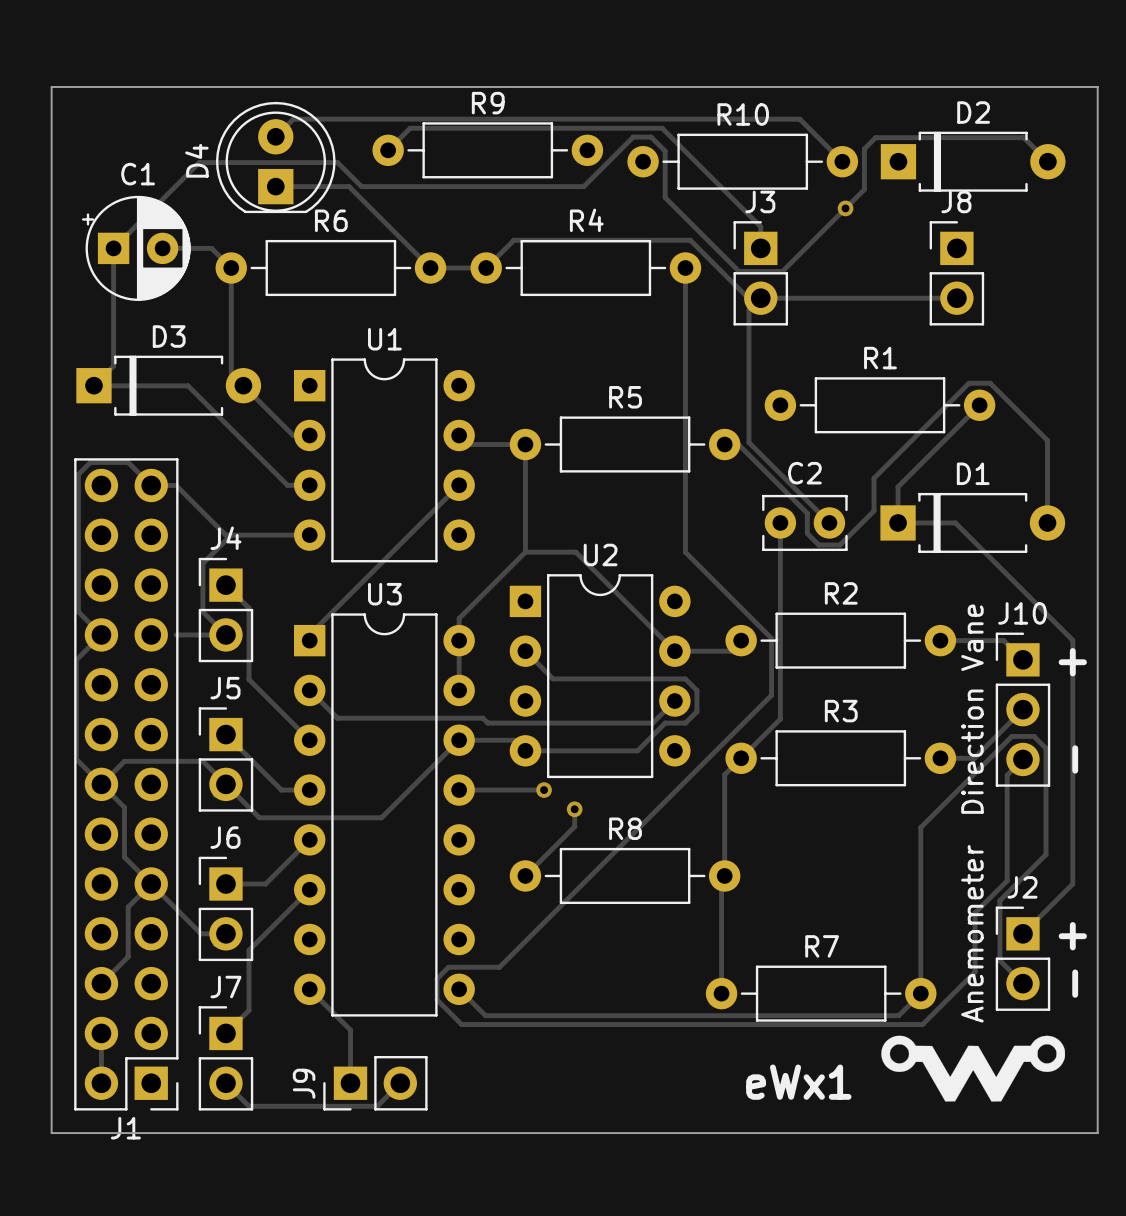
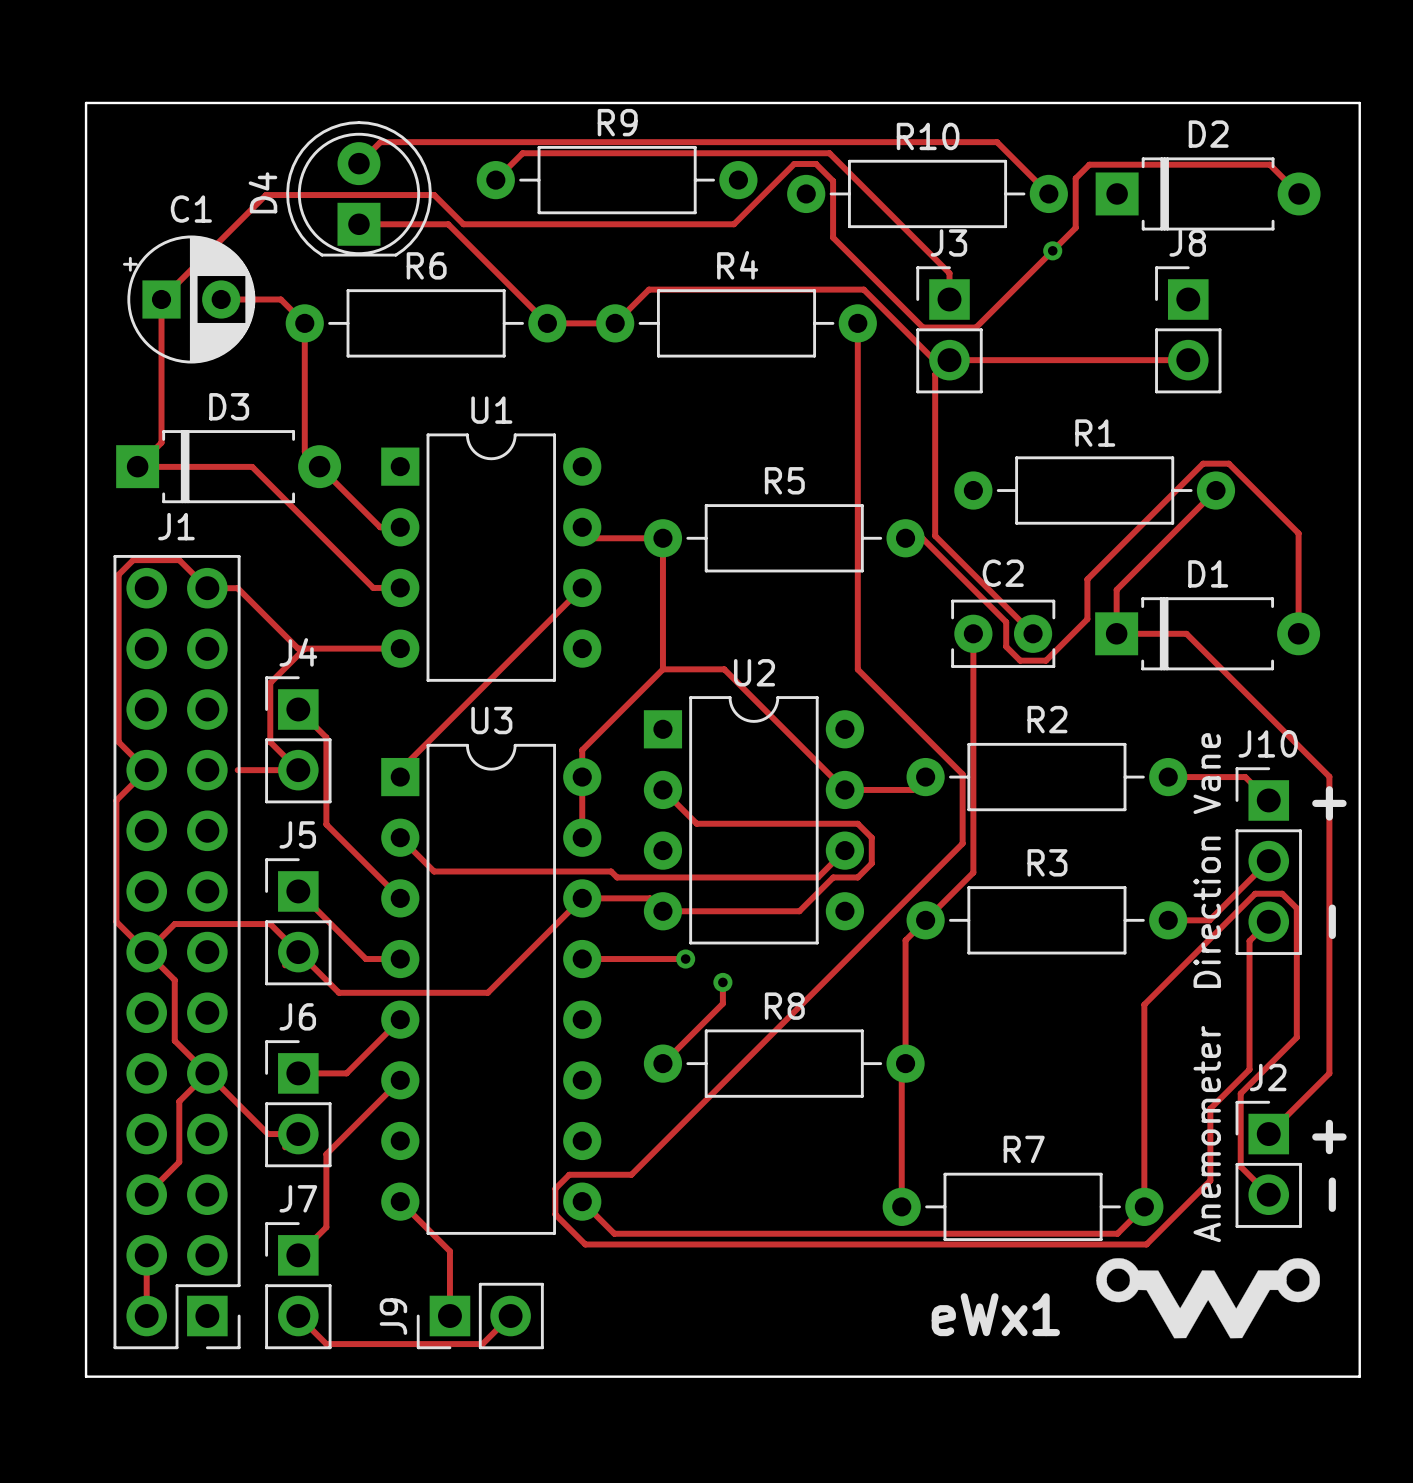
J1 name position: J1 (125, 1128) -> J1 (176, 526)

